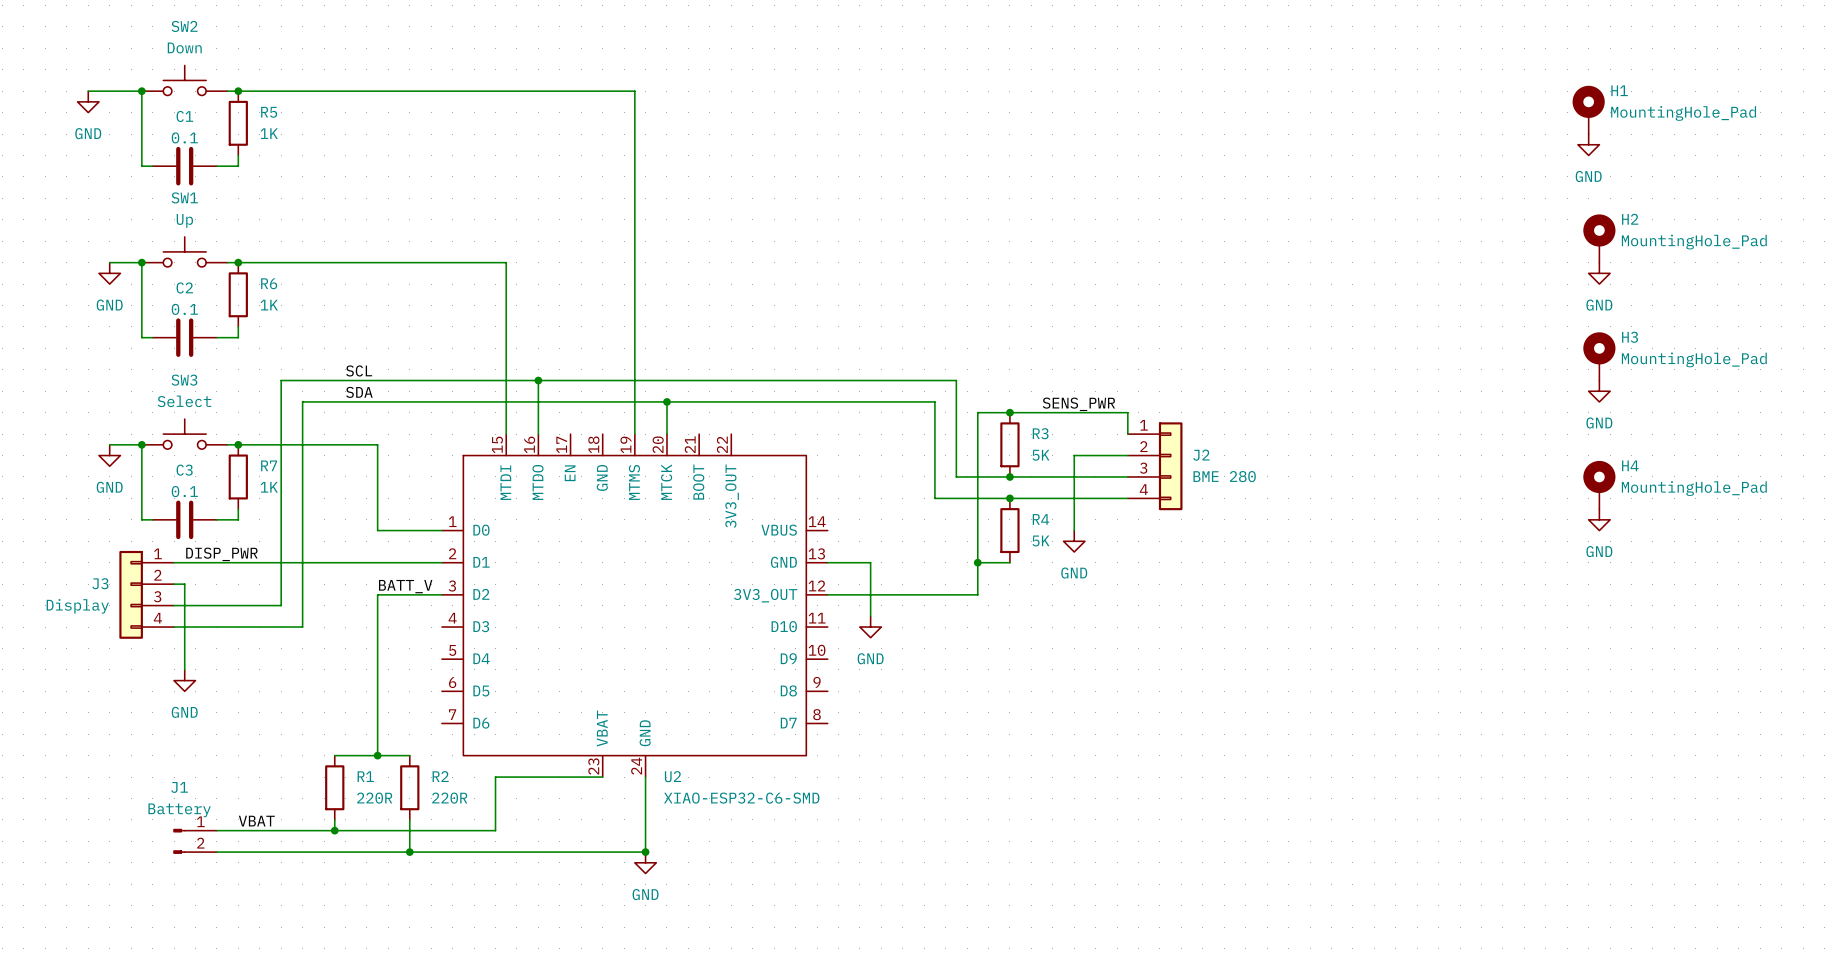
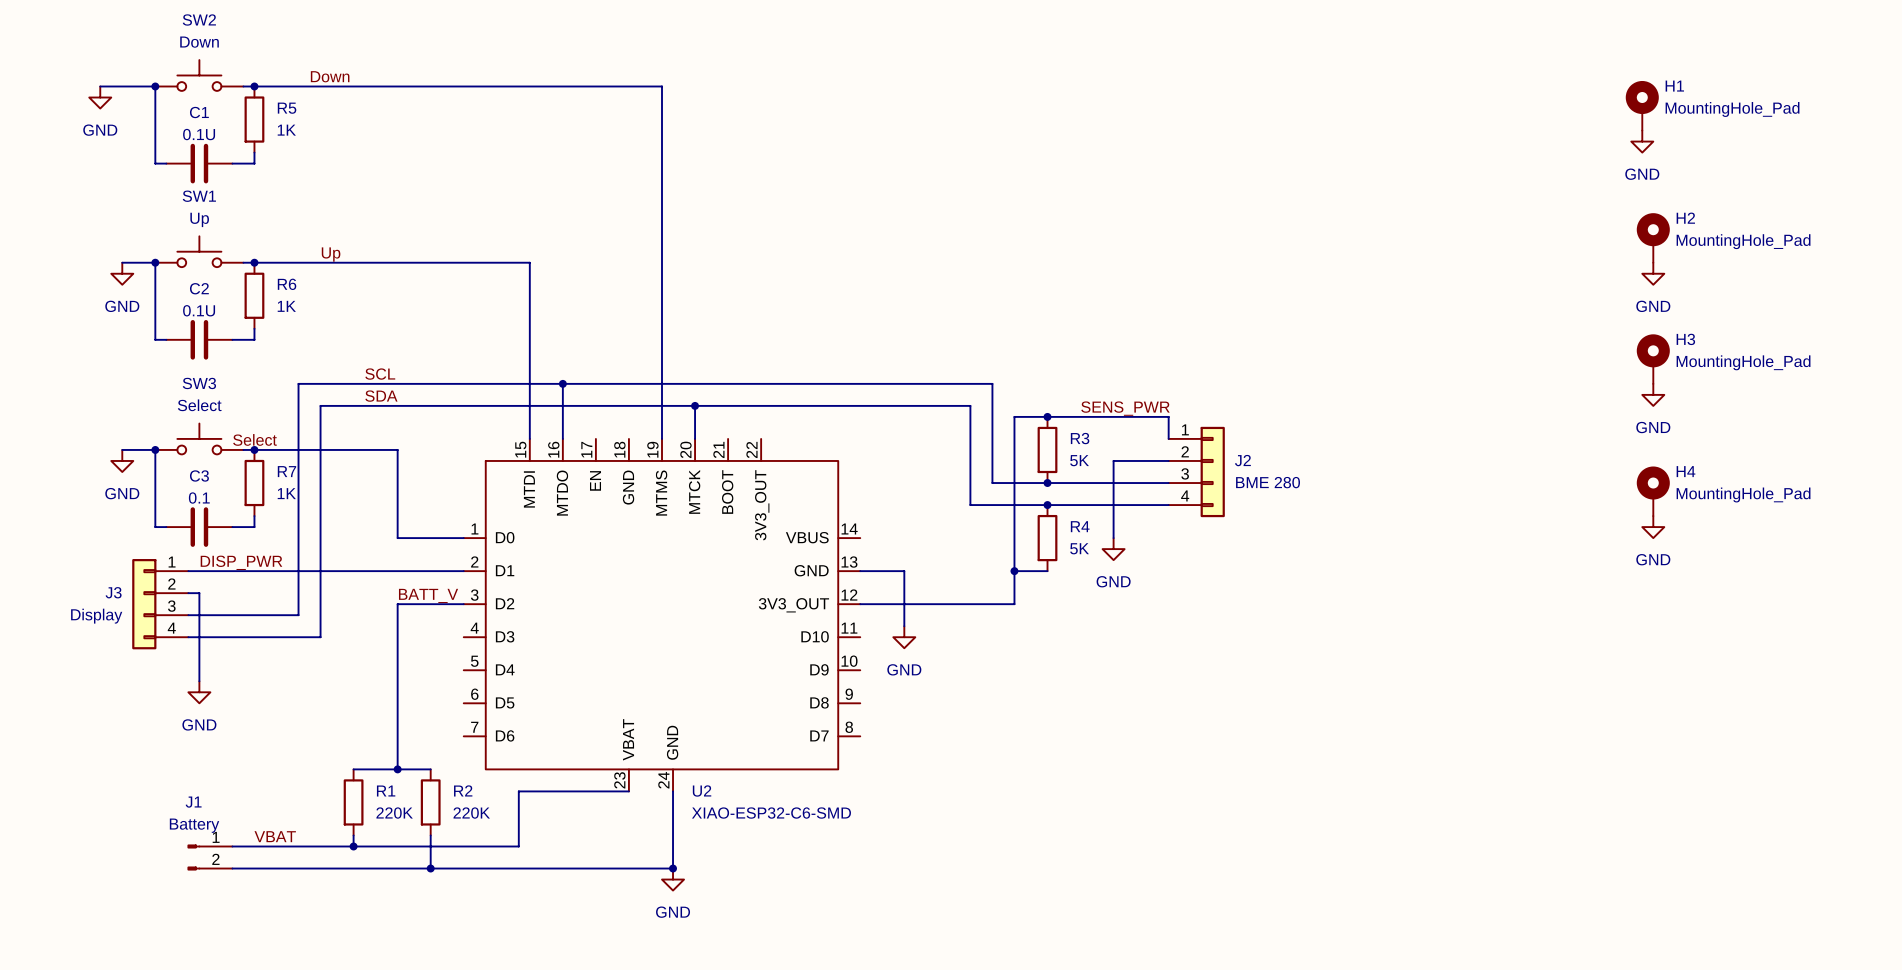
label: none -> Down (330, 76)
C1 value: 0.1 (184, 137) -> 0.1U (199, 134)
label: none -> Up (331, 254)
C2 value: 0.1 (184, 309) -> 0.1U (199, 310)
label: none -> Select (254, 439)
R1 value: 220R (374, 798) -> 220K (394, 813)
R2 value: 220R (449, 798) -> 220K (471, 813)

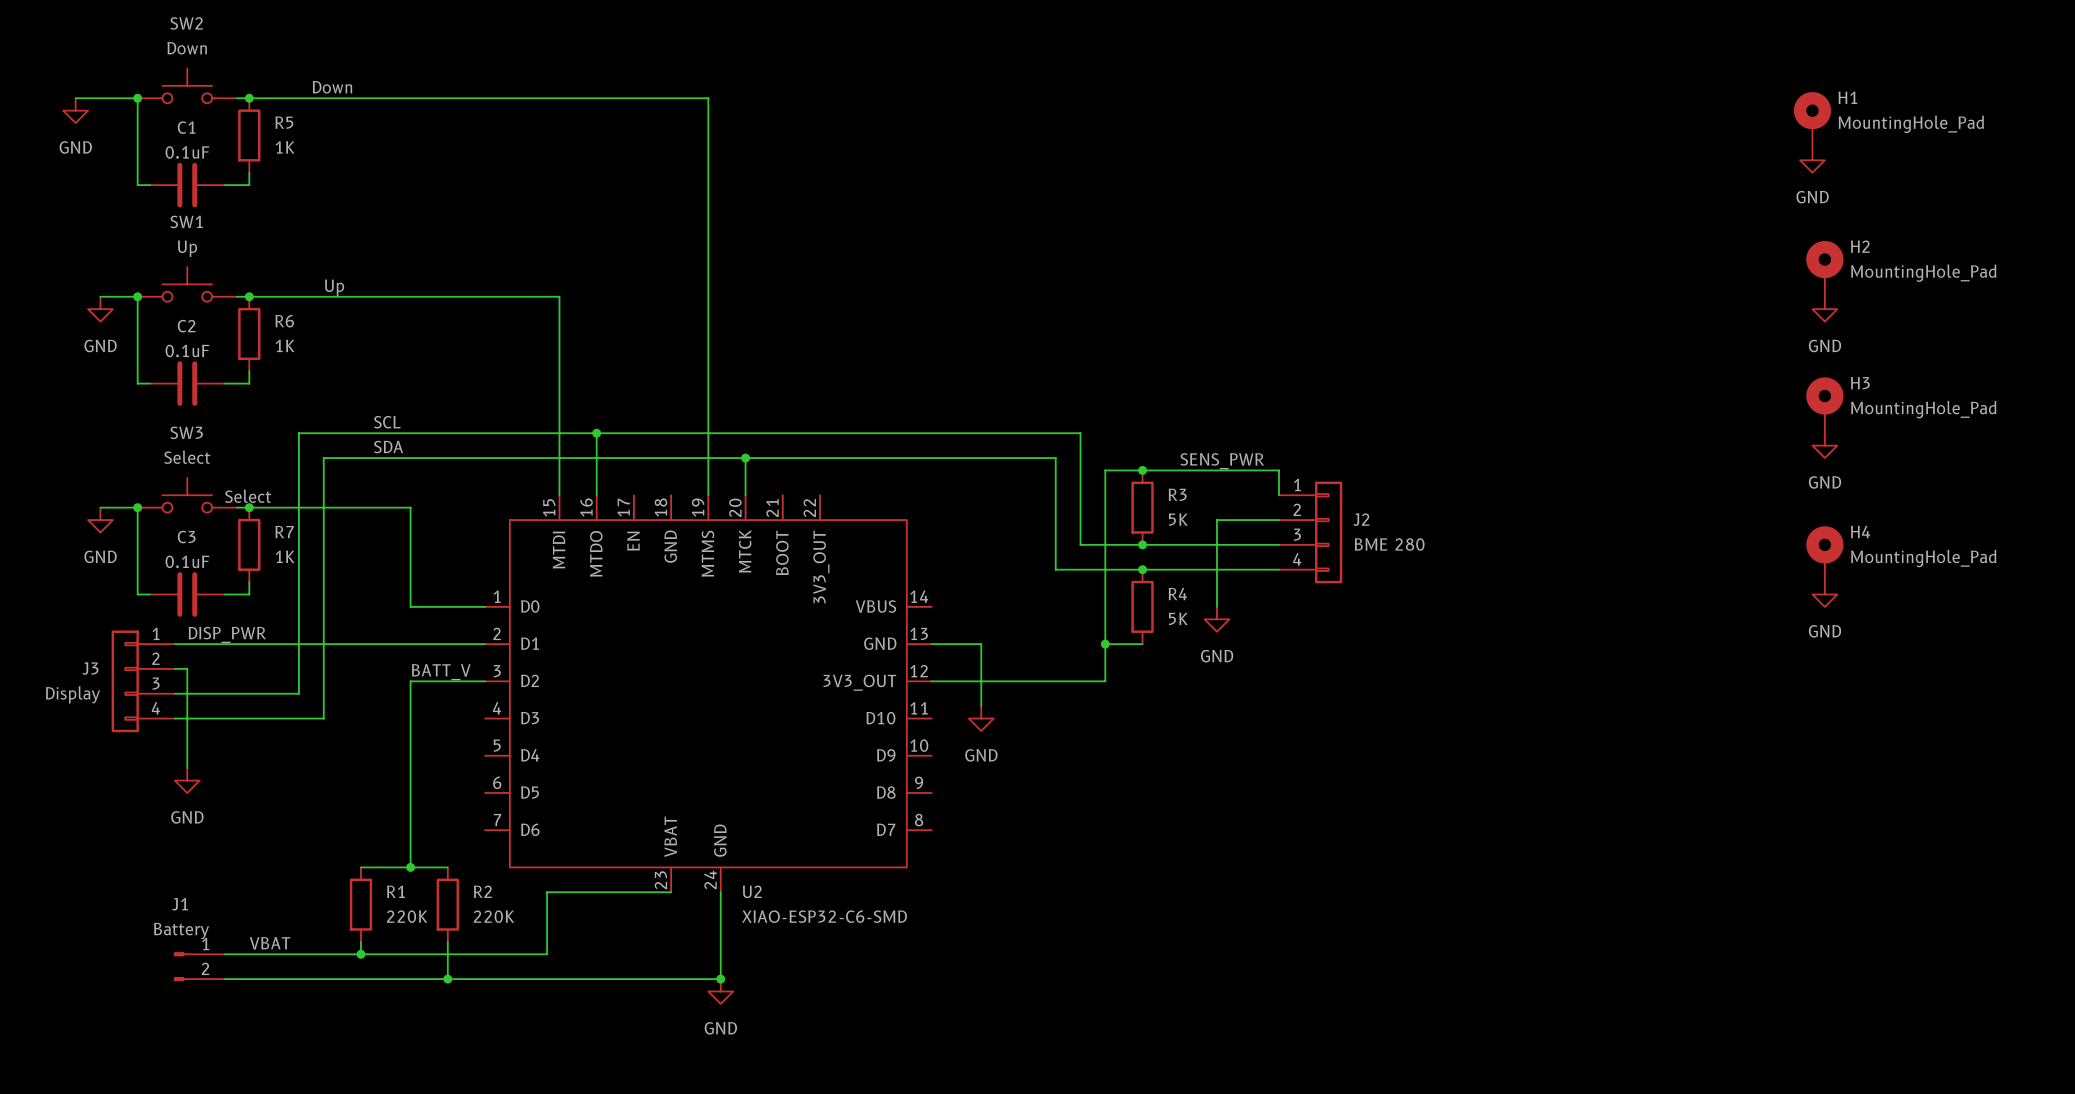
C1 value: 0.1U (199, 134) -> 0.1uF (187, 152)
C2 value: 0.1U (199, 310) -> 0.1uF (187, 350)
C3 value: 0.1 (199, 498) -> 0.1uF (187, 561)

